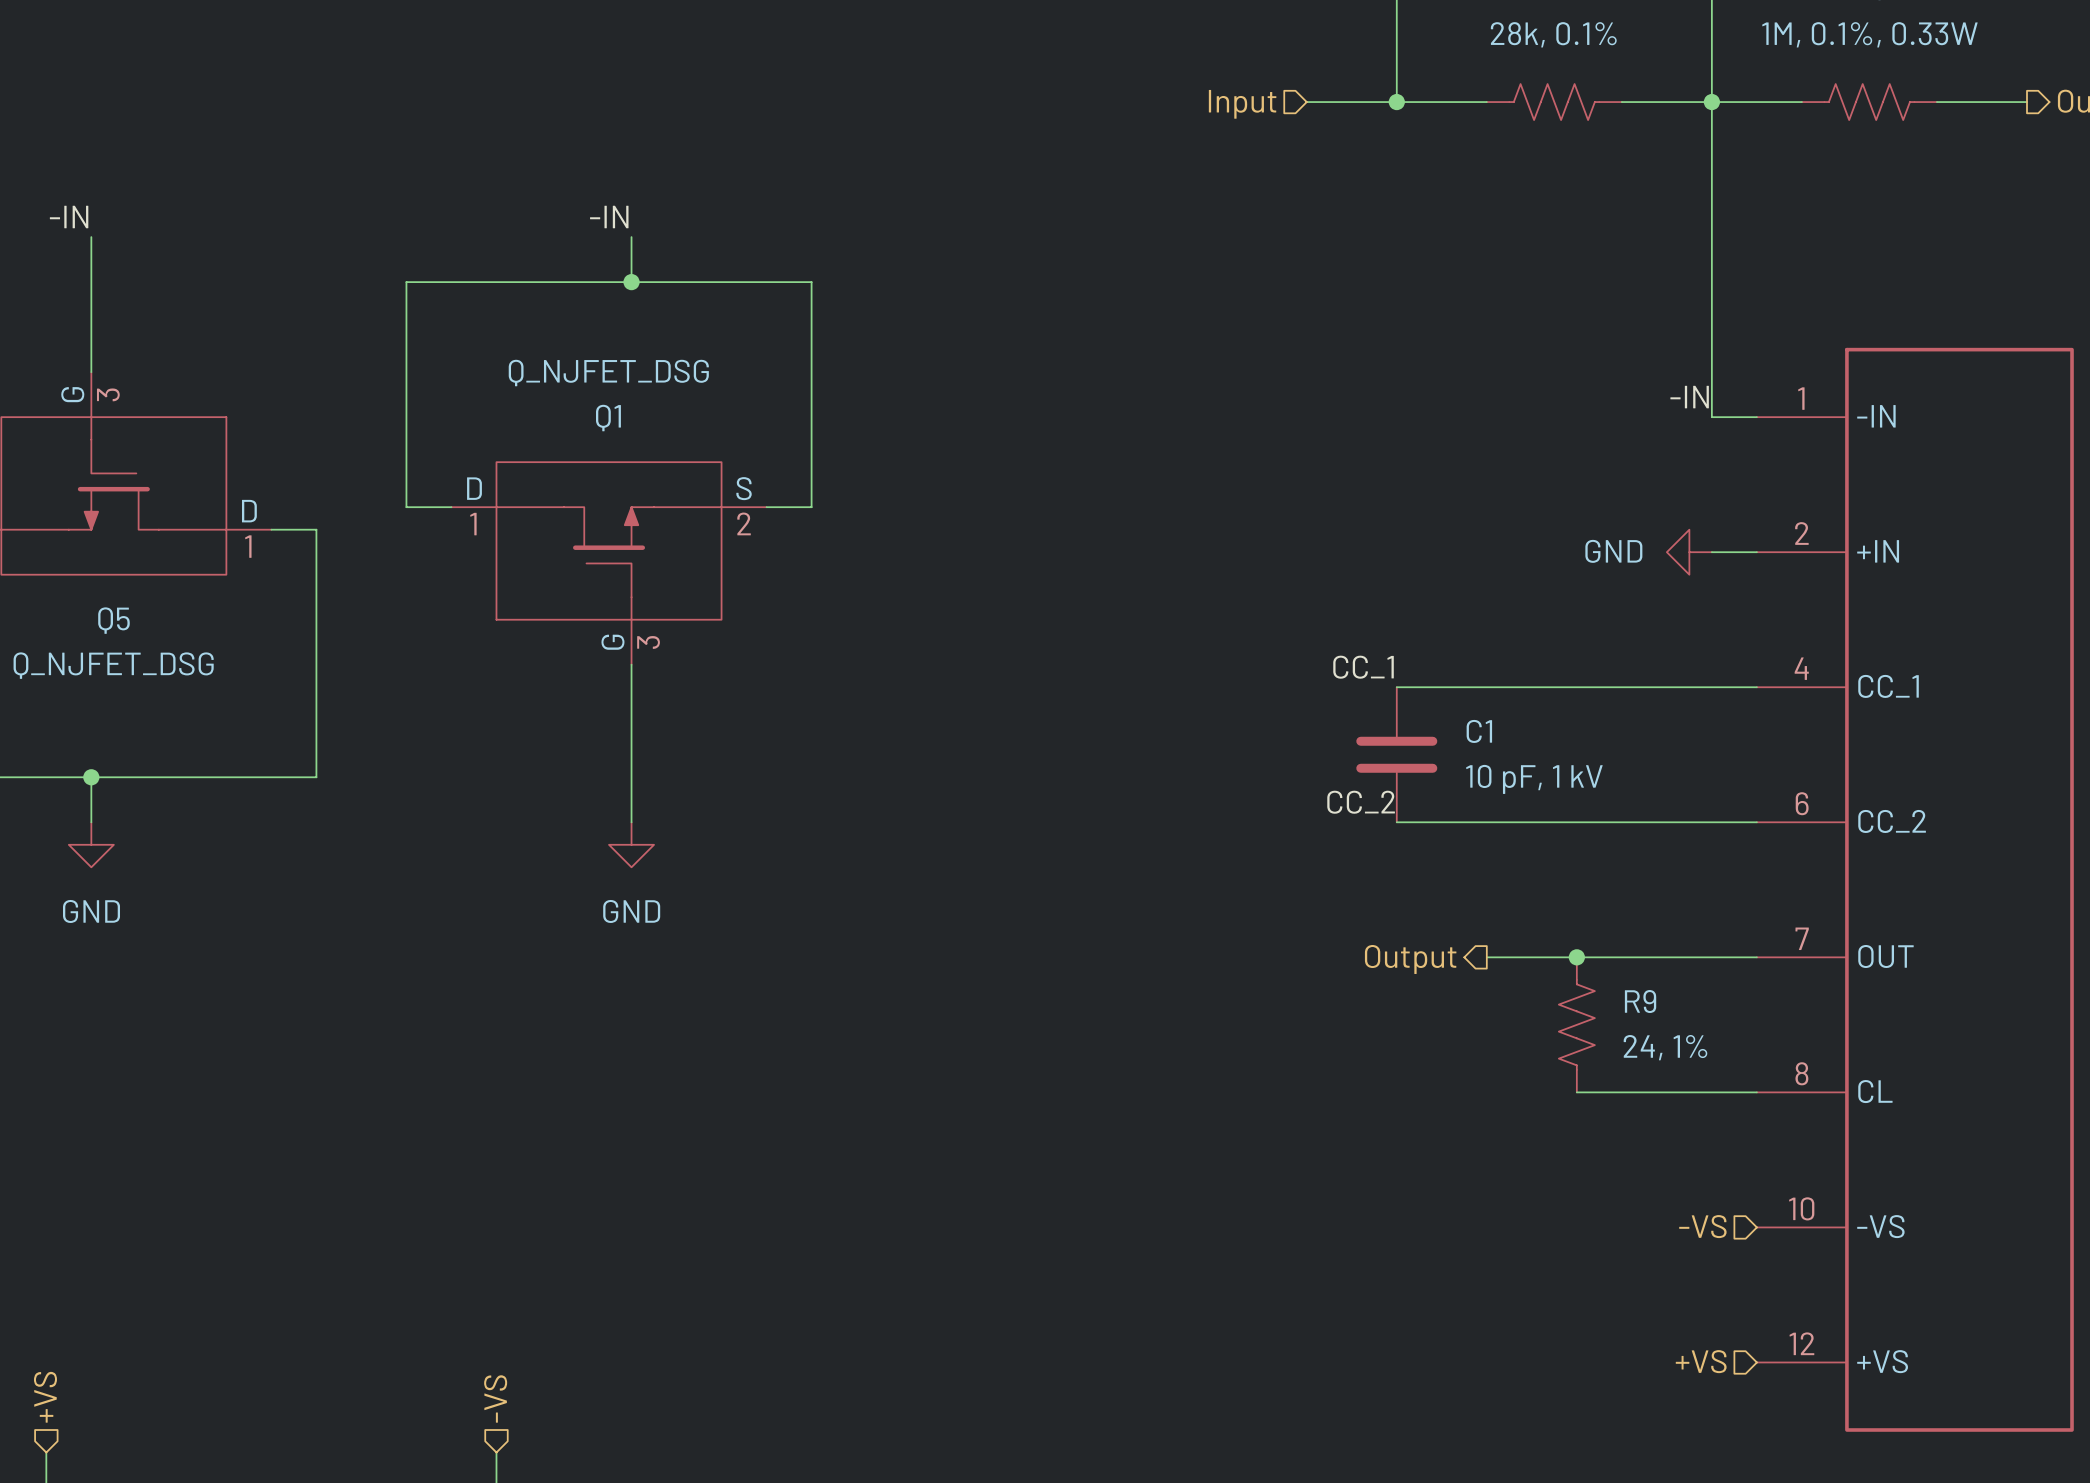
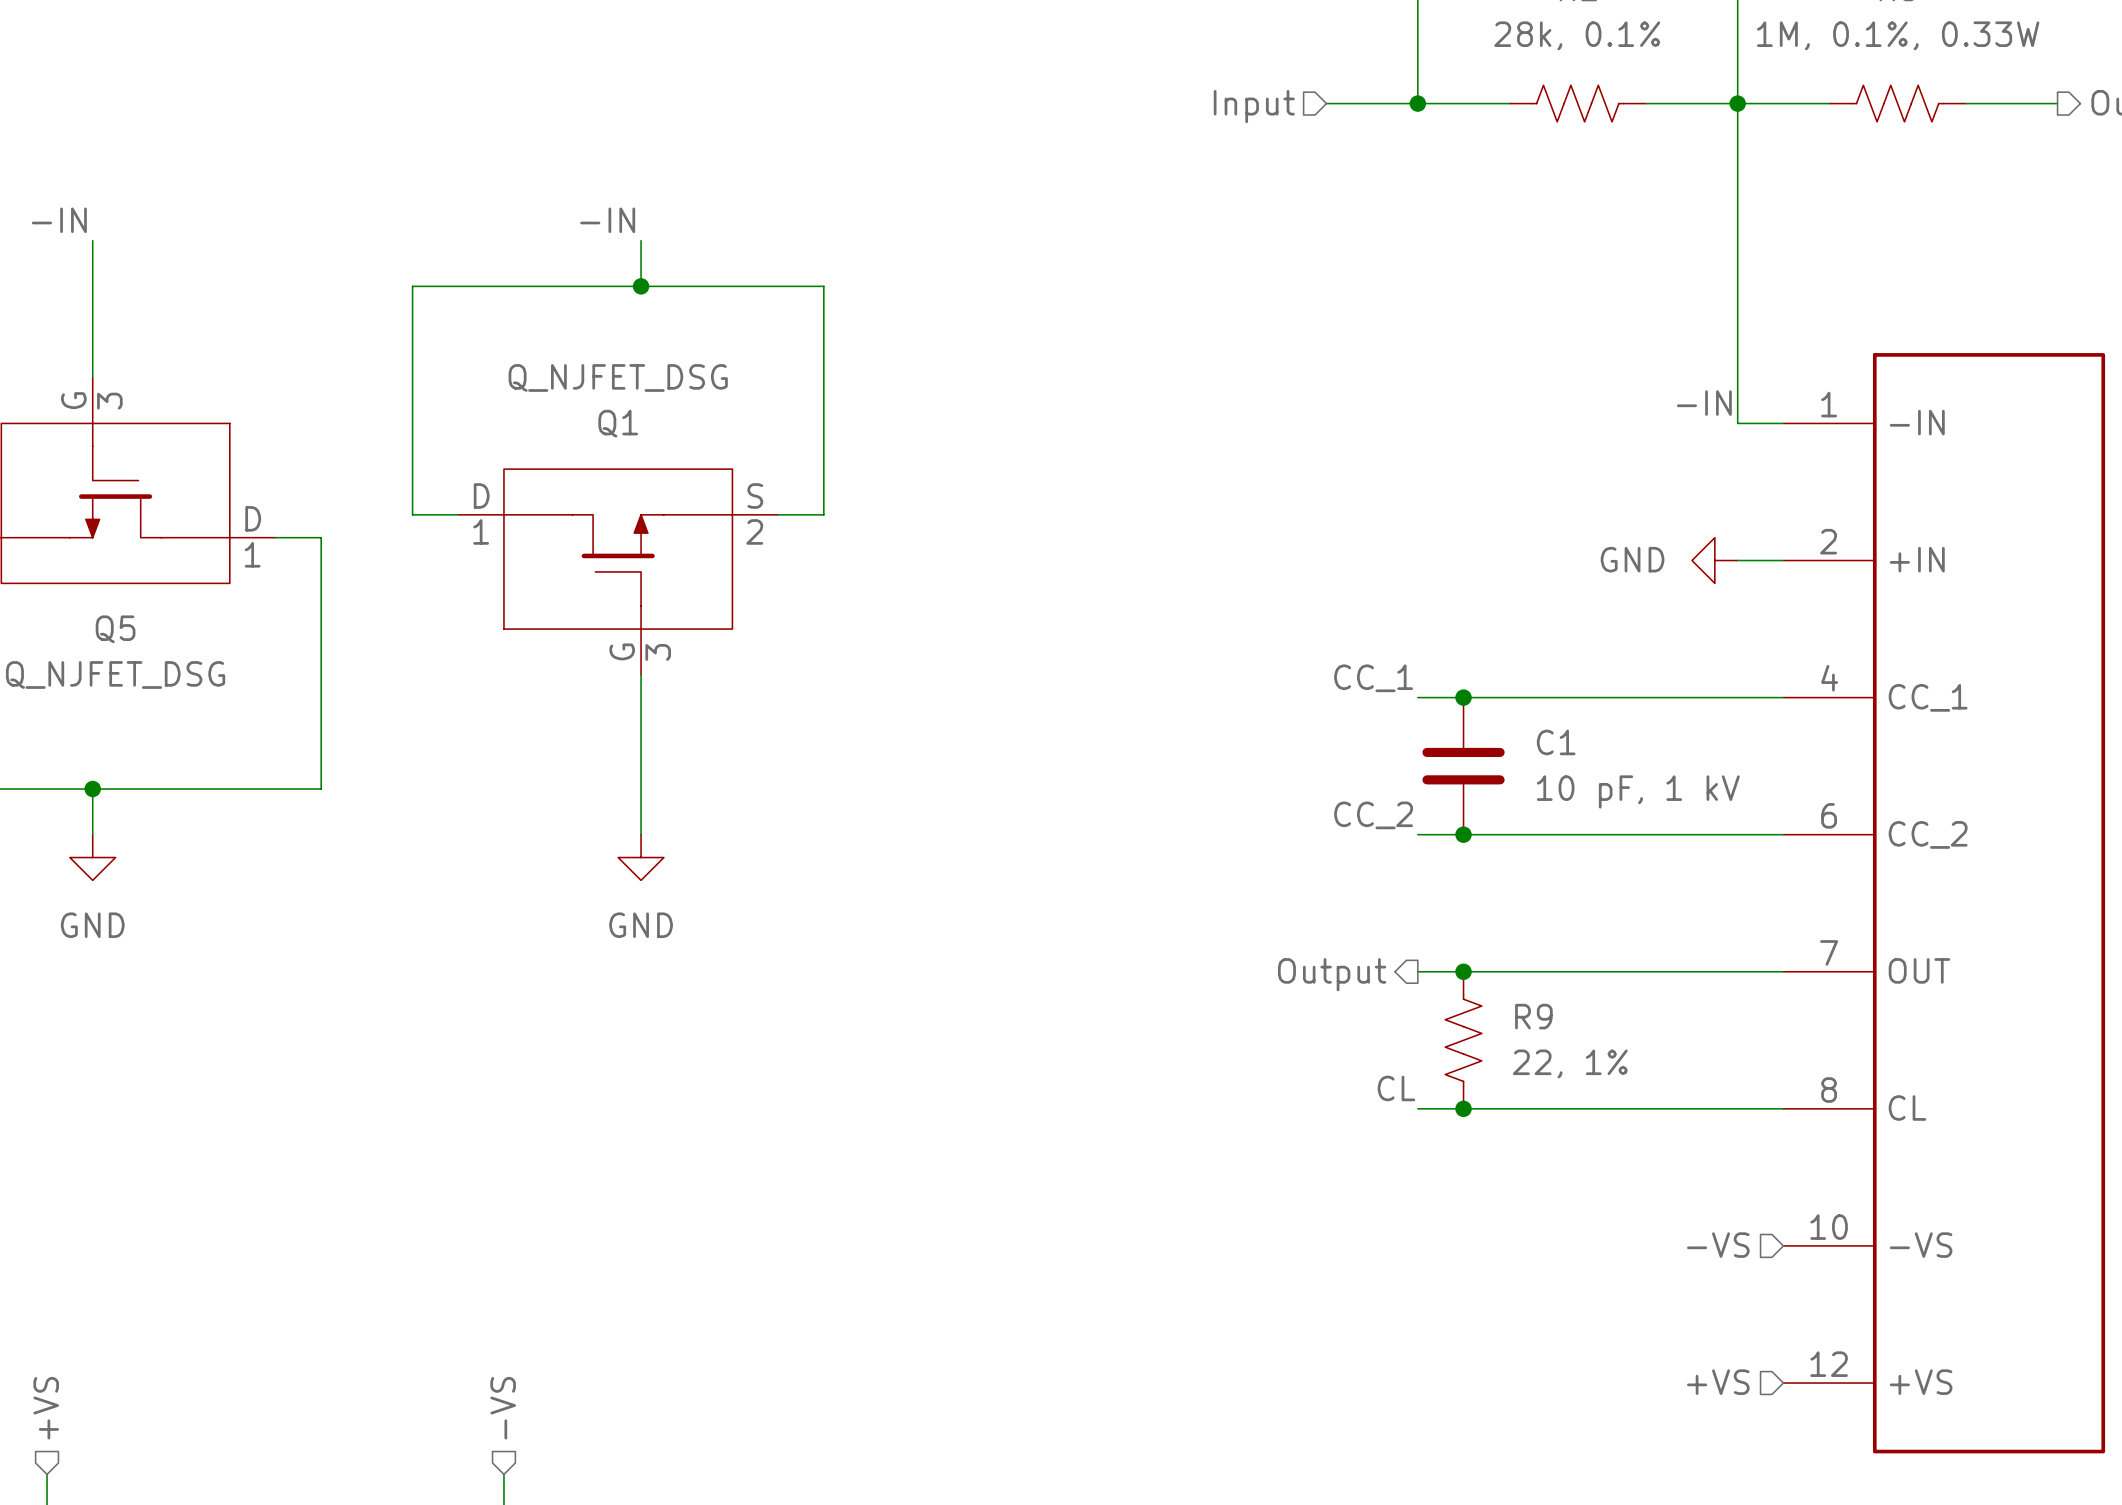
junction: none -> (1463, 697)
C1 position: (1396, 754) -> (1463, 766)
junction: none -> (1463, 834)
wire: none -> (1417, 971) (1509, 971)
junction: none -> (1463, 971)
junction: (1576, 957) -> none
hierarchical label position: Output (1410, 959) -> Output (1332, 974)
R9 position: (1576, 1024) -> (1463, 1040)
R9 value: 24, 1% (1665, 1047) -> 22, 1% (1570, 1063)
label: none -> CL (1396, 1088)
wire: none -> (1417, 1108) (1600, 1108)
junction: none -> (1463, 1108)

